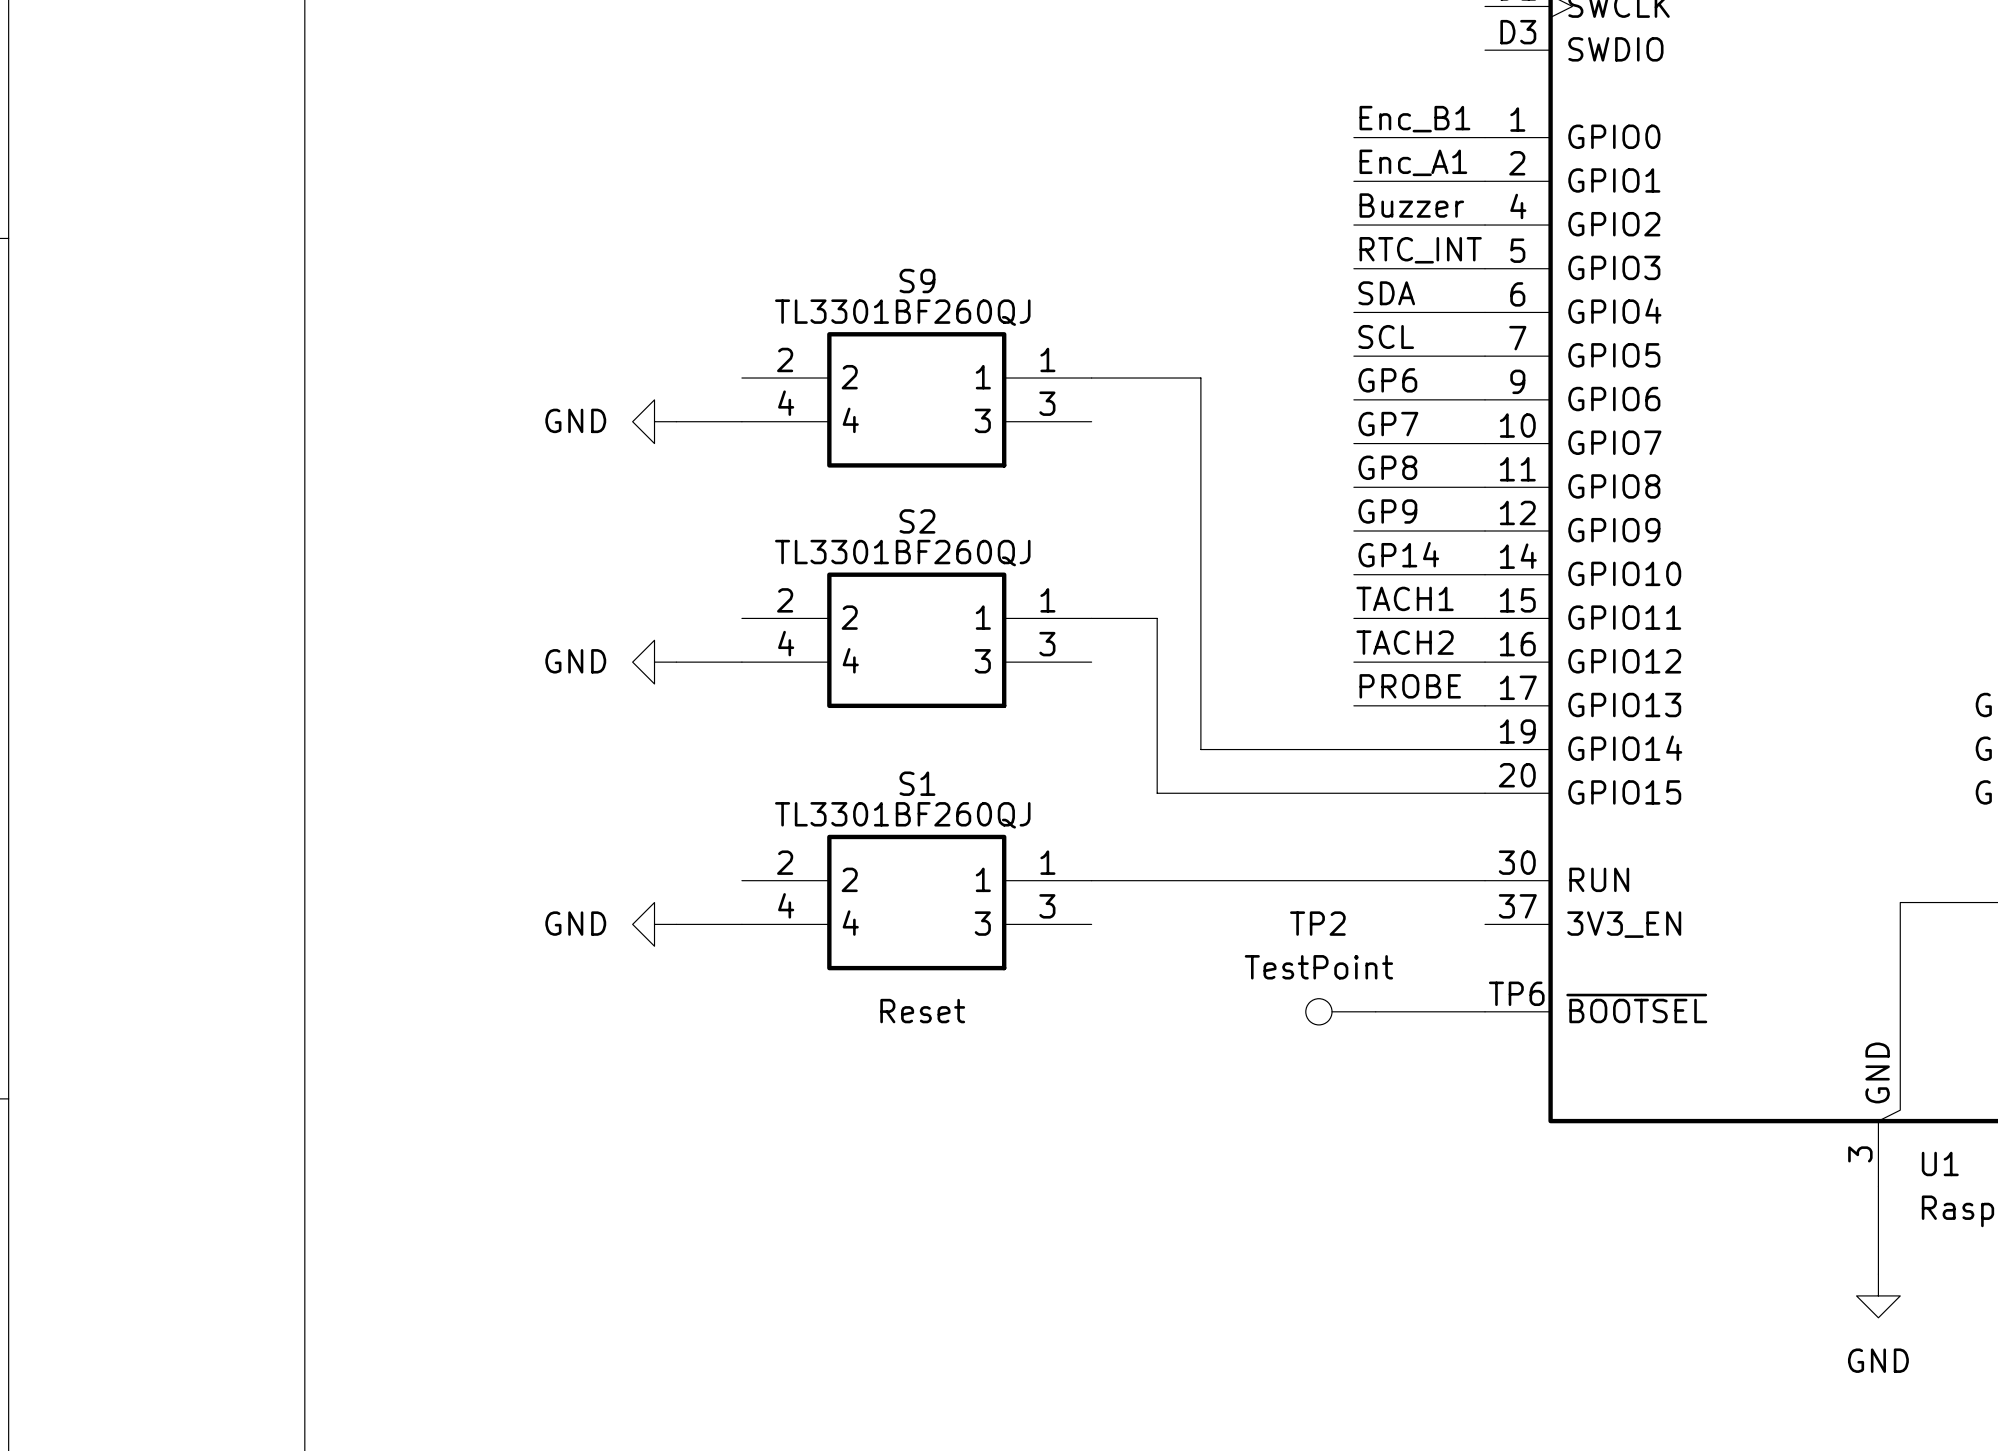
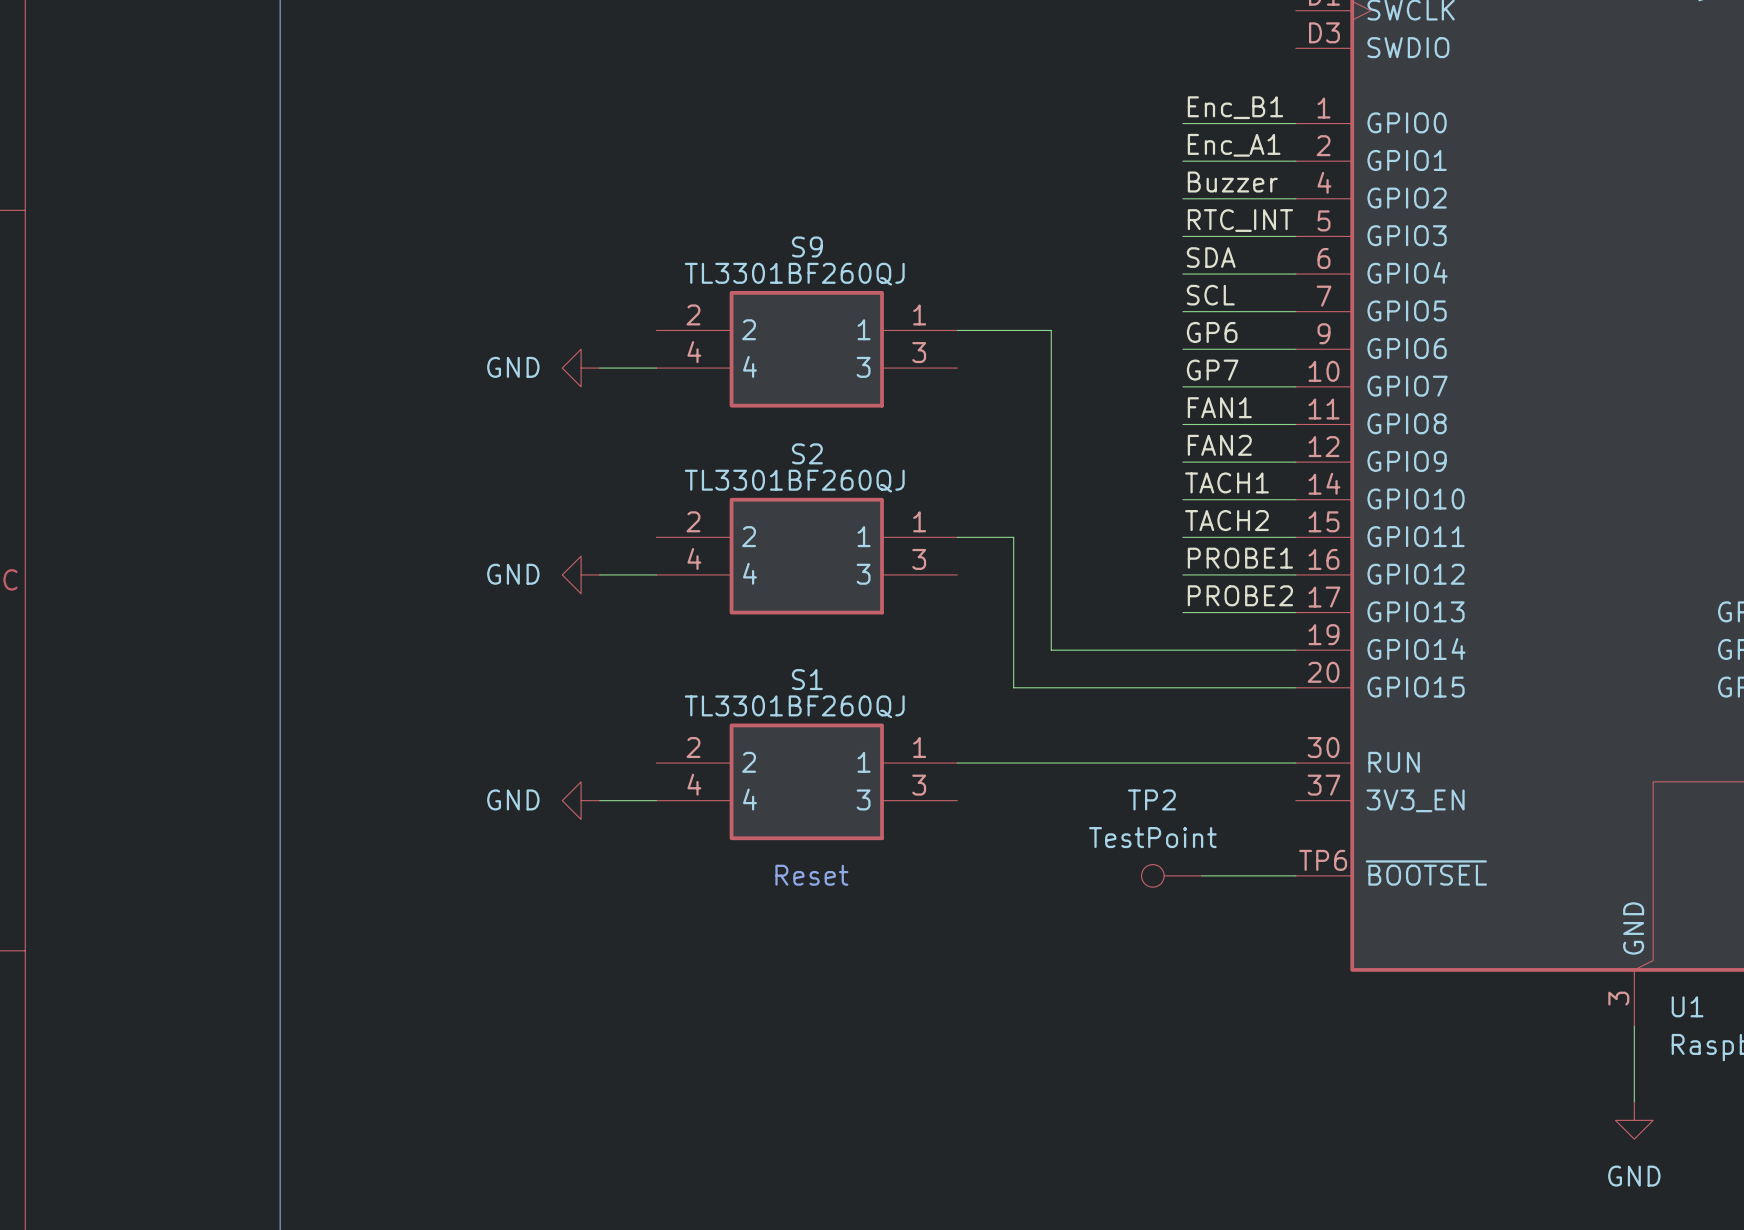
label: GP8 (1387, 467) -> FAN1 (1219, 407)
label: GP9 (1387, 511) -> FAN2 (1219, 445)
label: GP14 (1398, 554) -> TACH1 (1226, 482)
label: TACH1 (1405, 598) -> TACH2 (1226, 520)
label: TACH2 (1405, 642) -> PROBE1 (1240, 558)
label: PROBE (1410, 686) -> PROBE2 (1240, 595)

